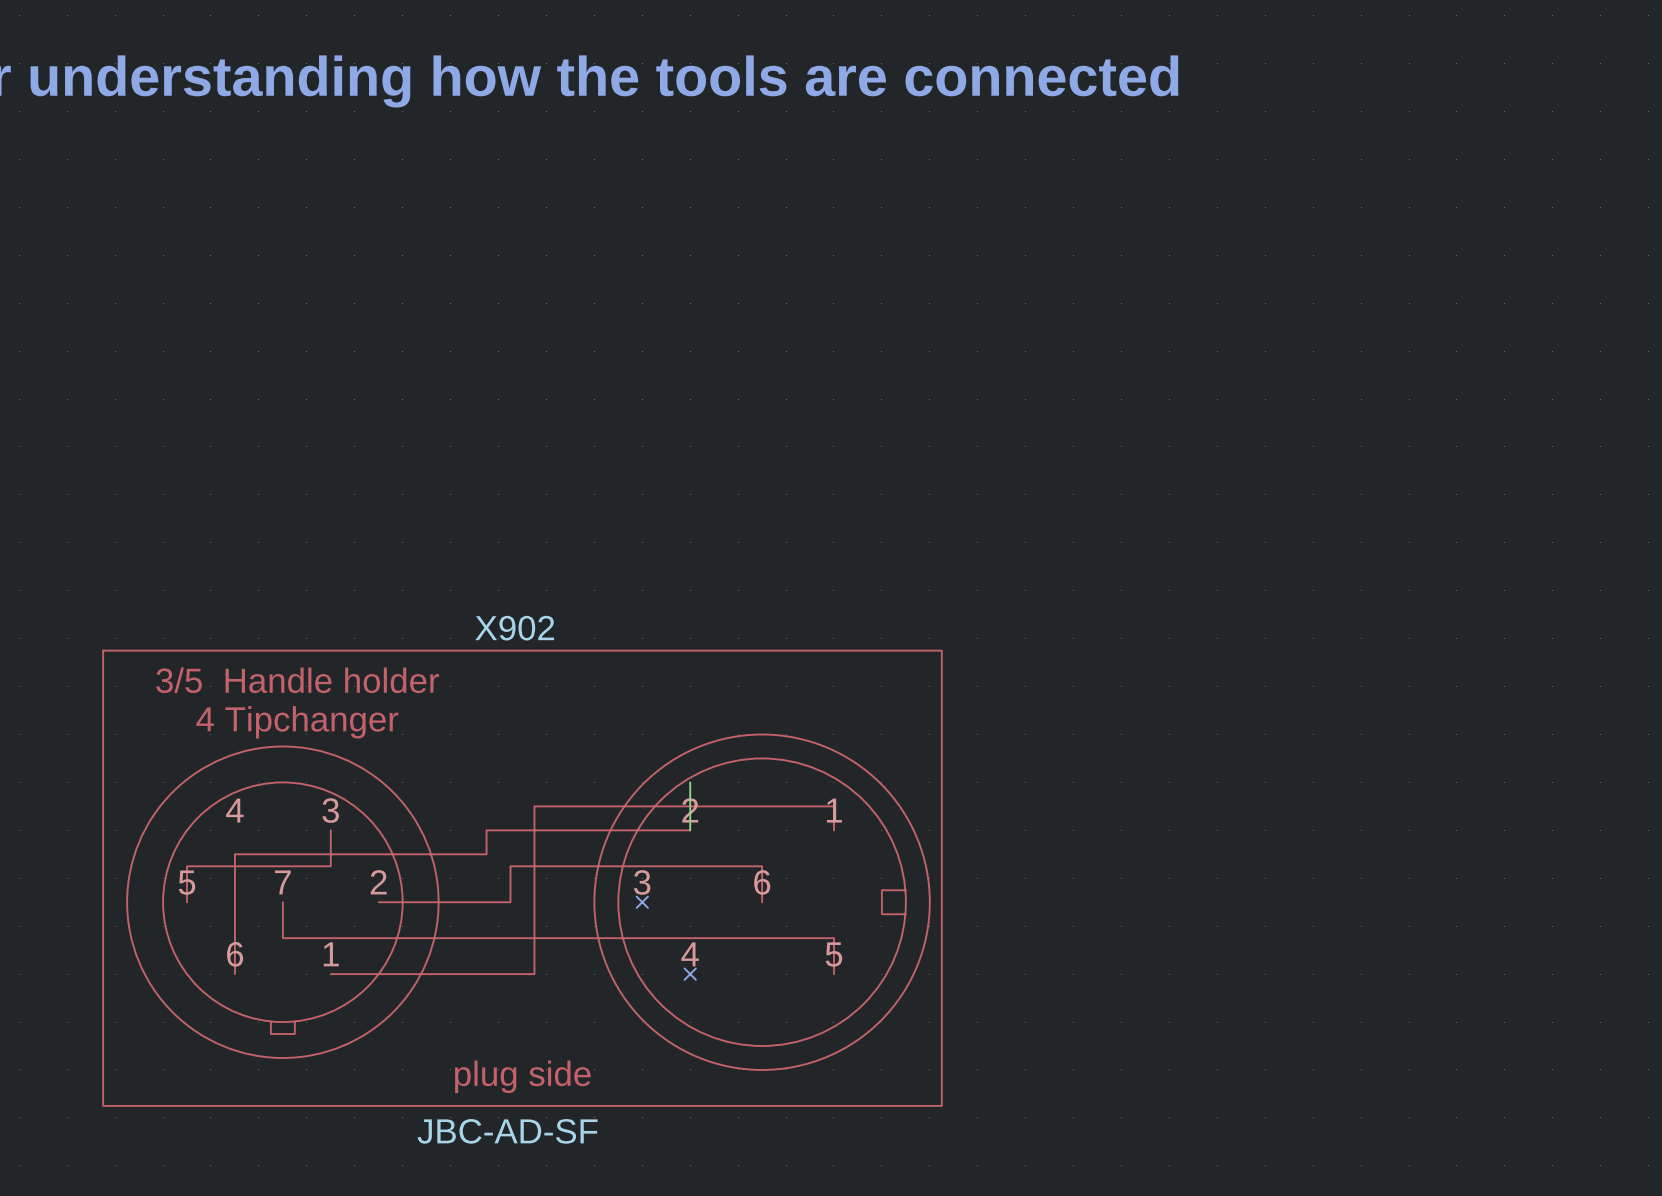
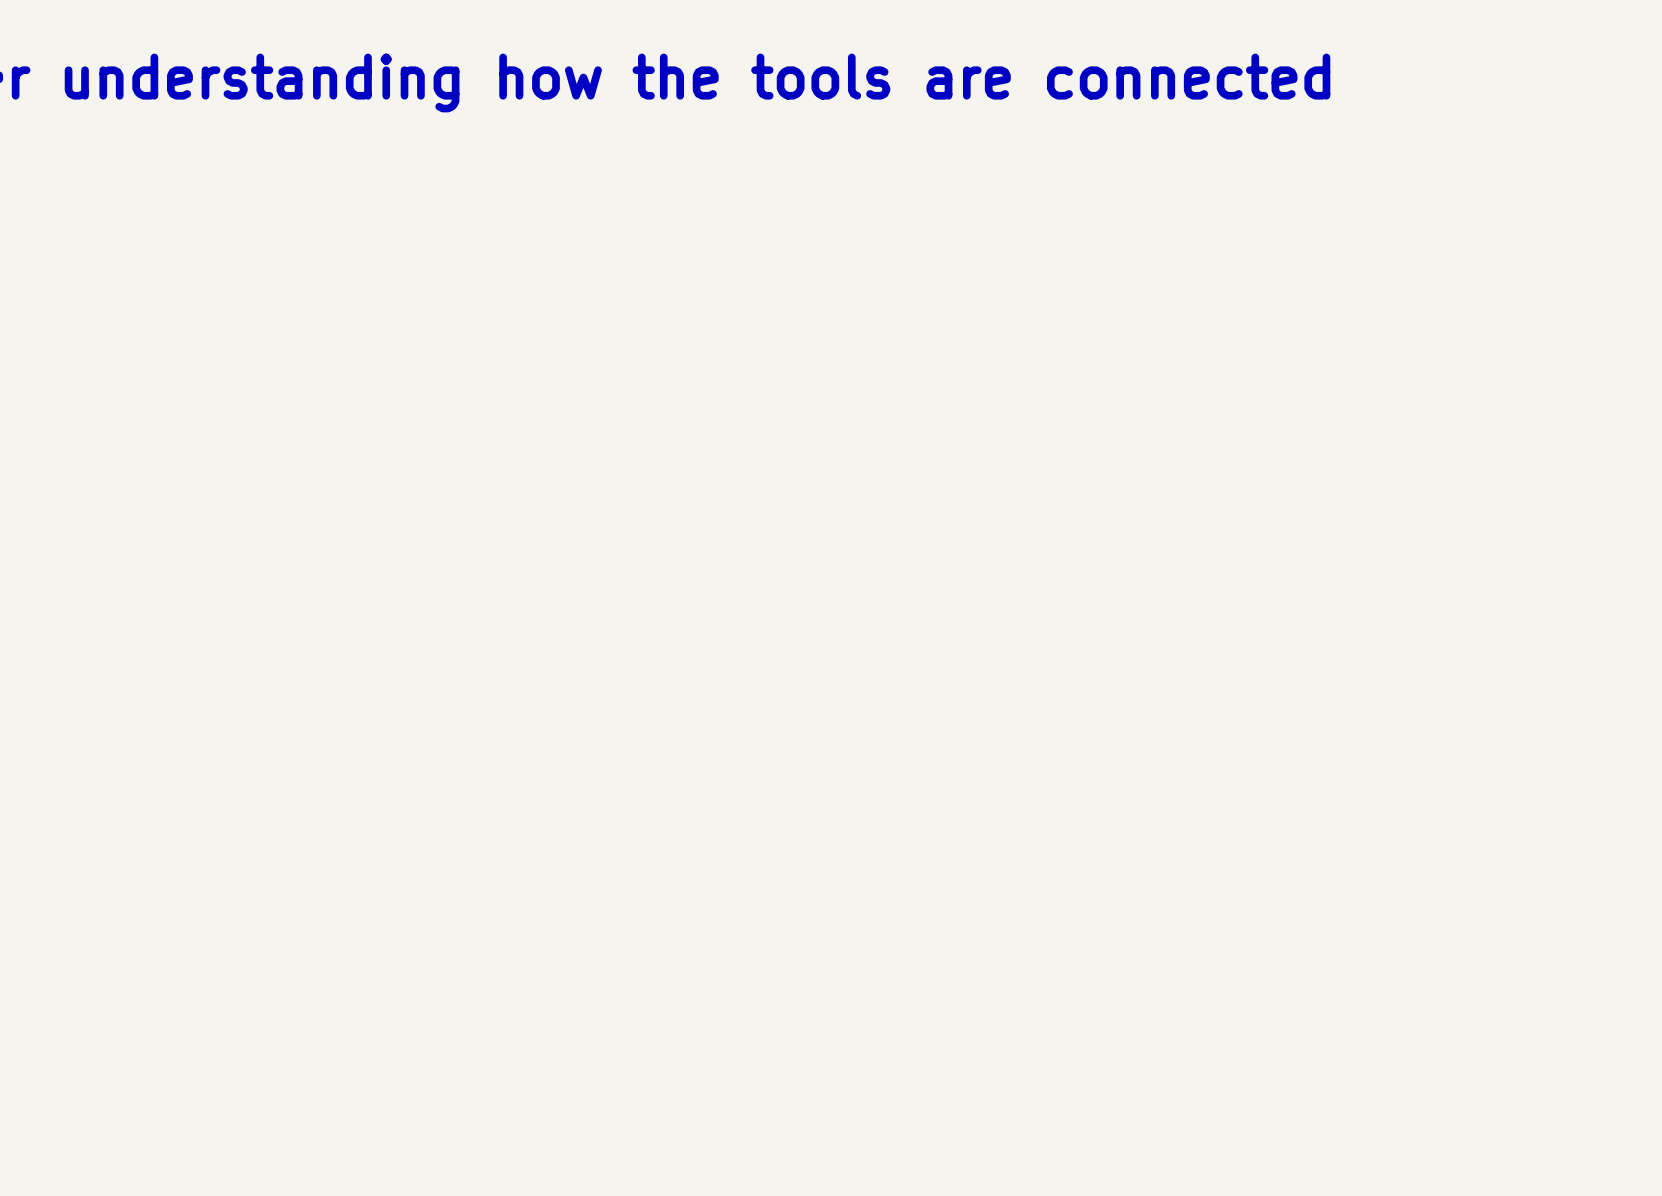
wire: (690, 782) (690, 830) -> none
X902: JBC-AD-SF (522, 878) -> none

